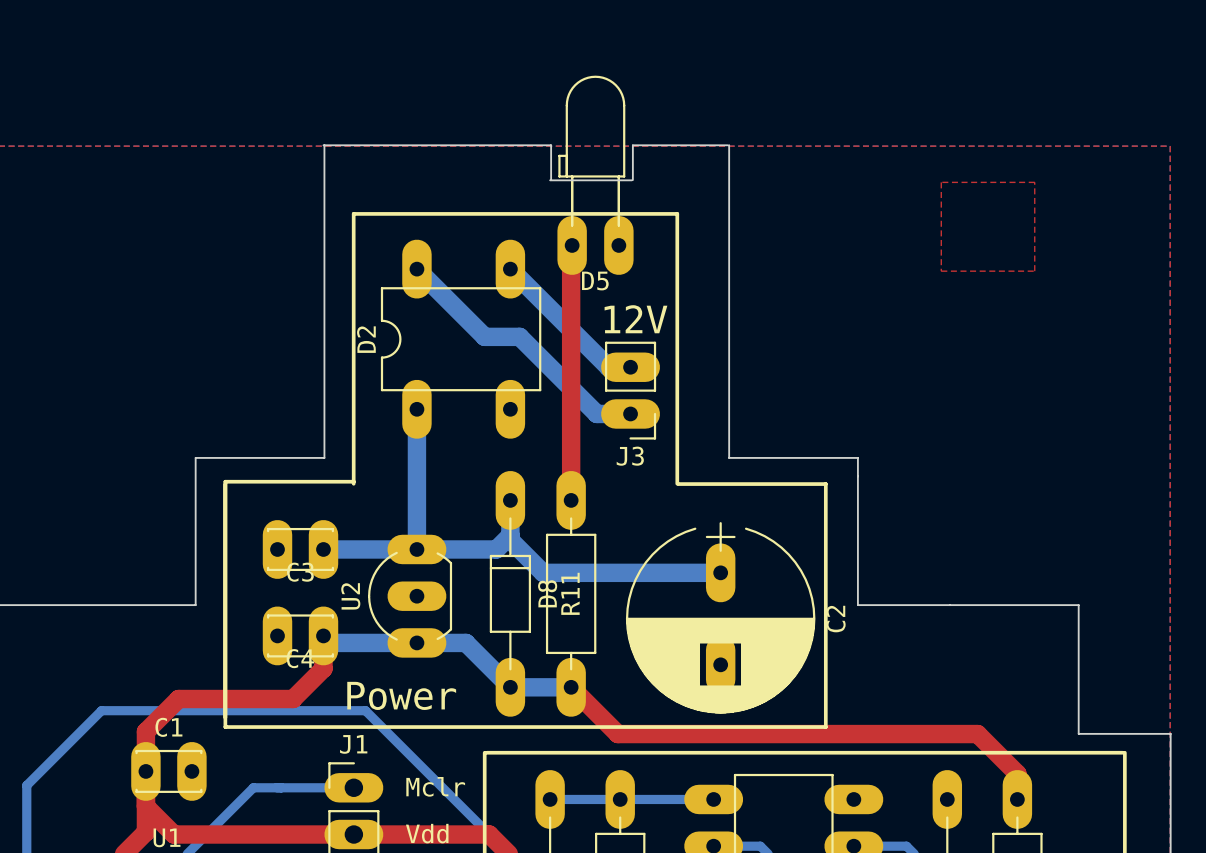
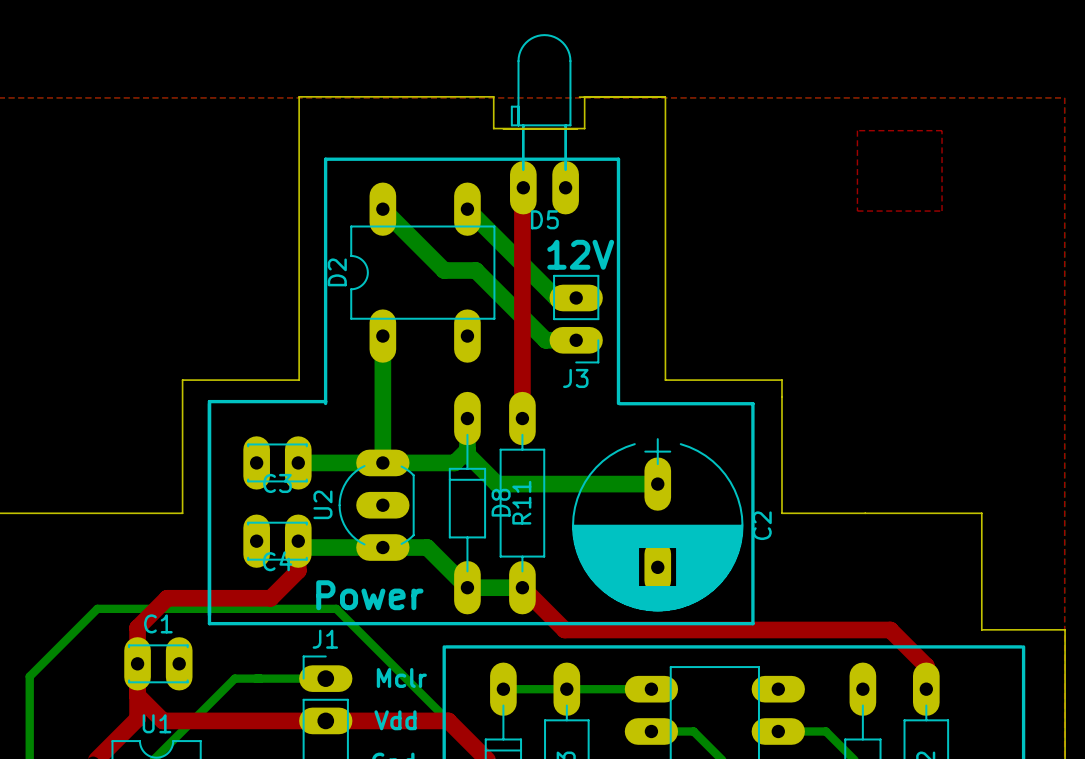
board edge: none -> (299, 96) (493, 96) (493, 128) (584, 128) (584, 96) (665, 96)
board edge: (551, 144) (551, 180) -> none
board edge: (632, 144) (632, 180) -> none
board edge: (323, 145) (550, 145) -> none

